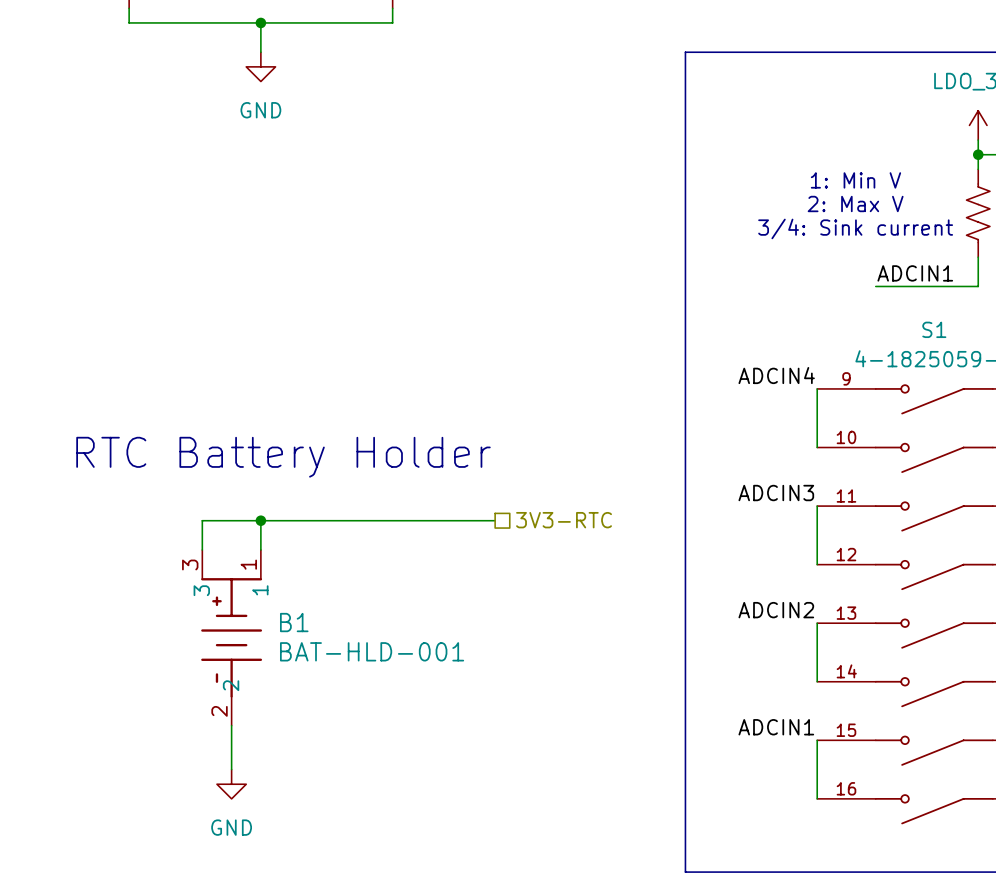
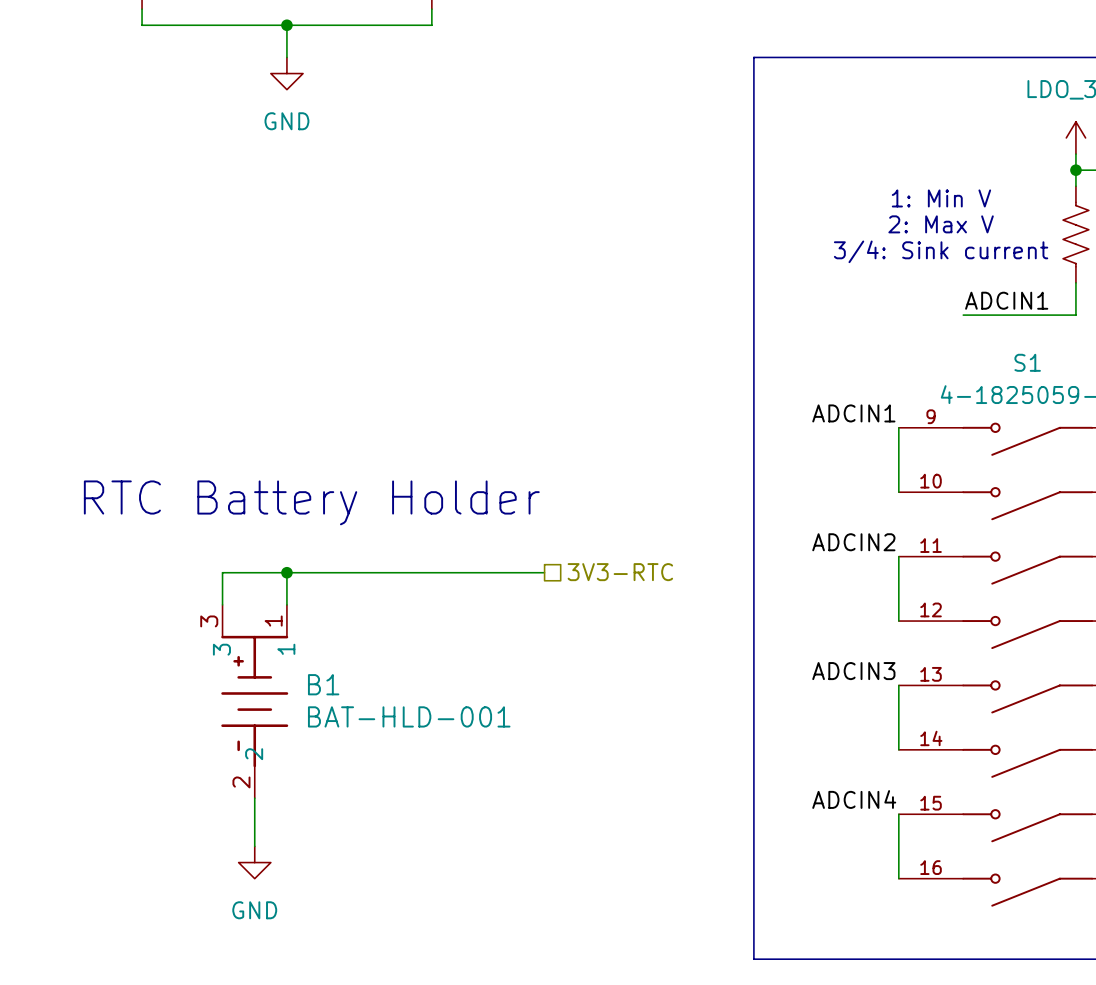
label: ADCIN4 (776, 375) -> ADCIN1 (853, 413)
label: ADCIN3 (776, 493) -> ADCIN2 (853, 542)
label: ADCIN2 (776, 610) -> ADCIN3 (853, 671)
label: ADCIN1 (776, 727) -> ADCIN4 (854, 799)

